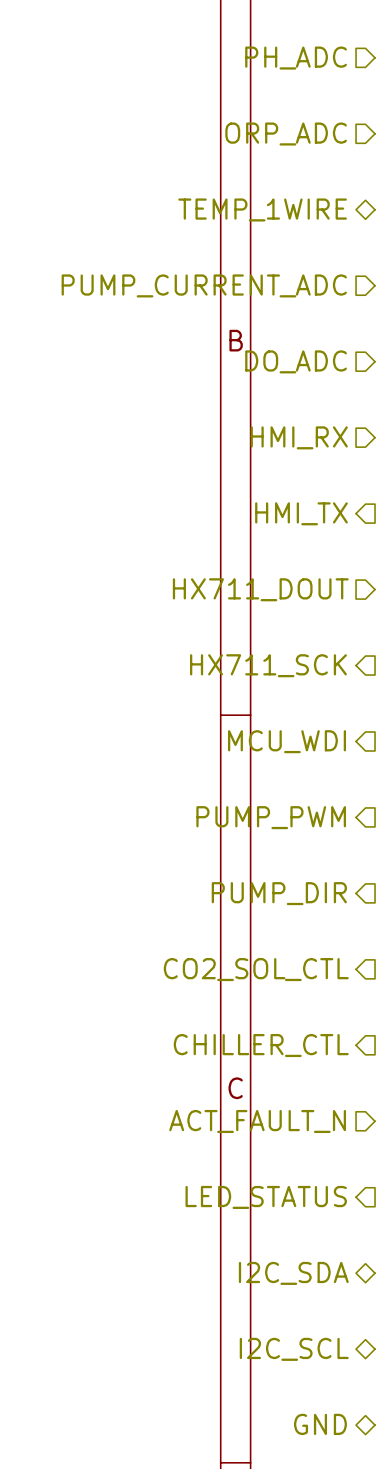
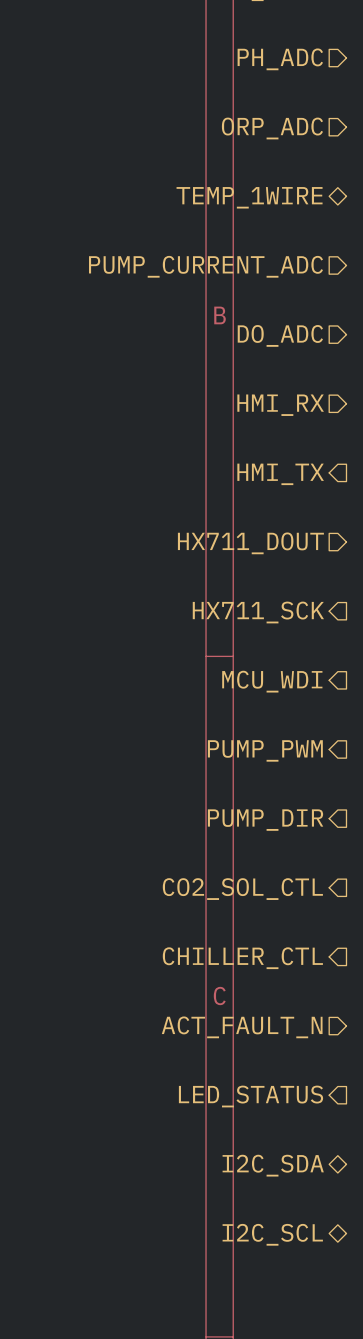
hierarchical label: GND (320, 1424) -> none

